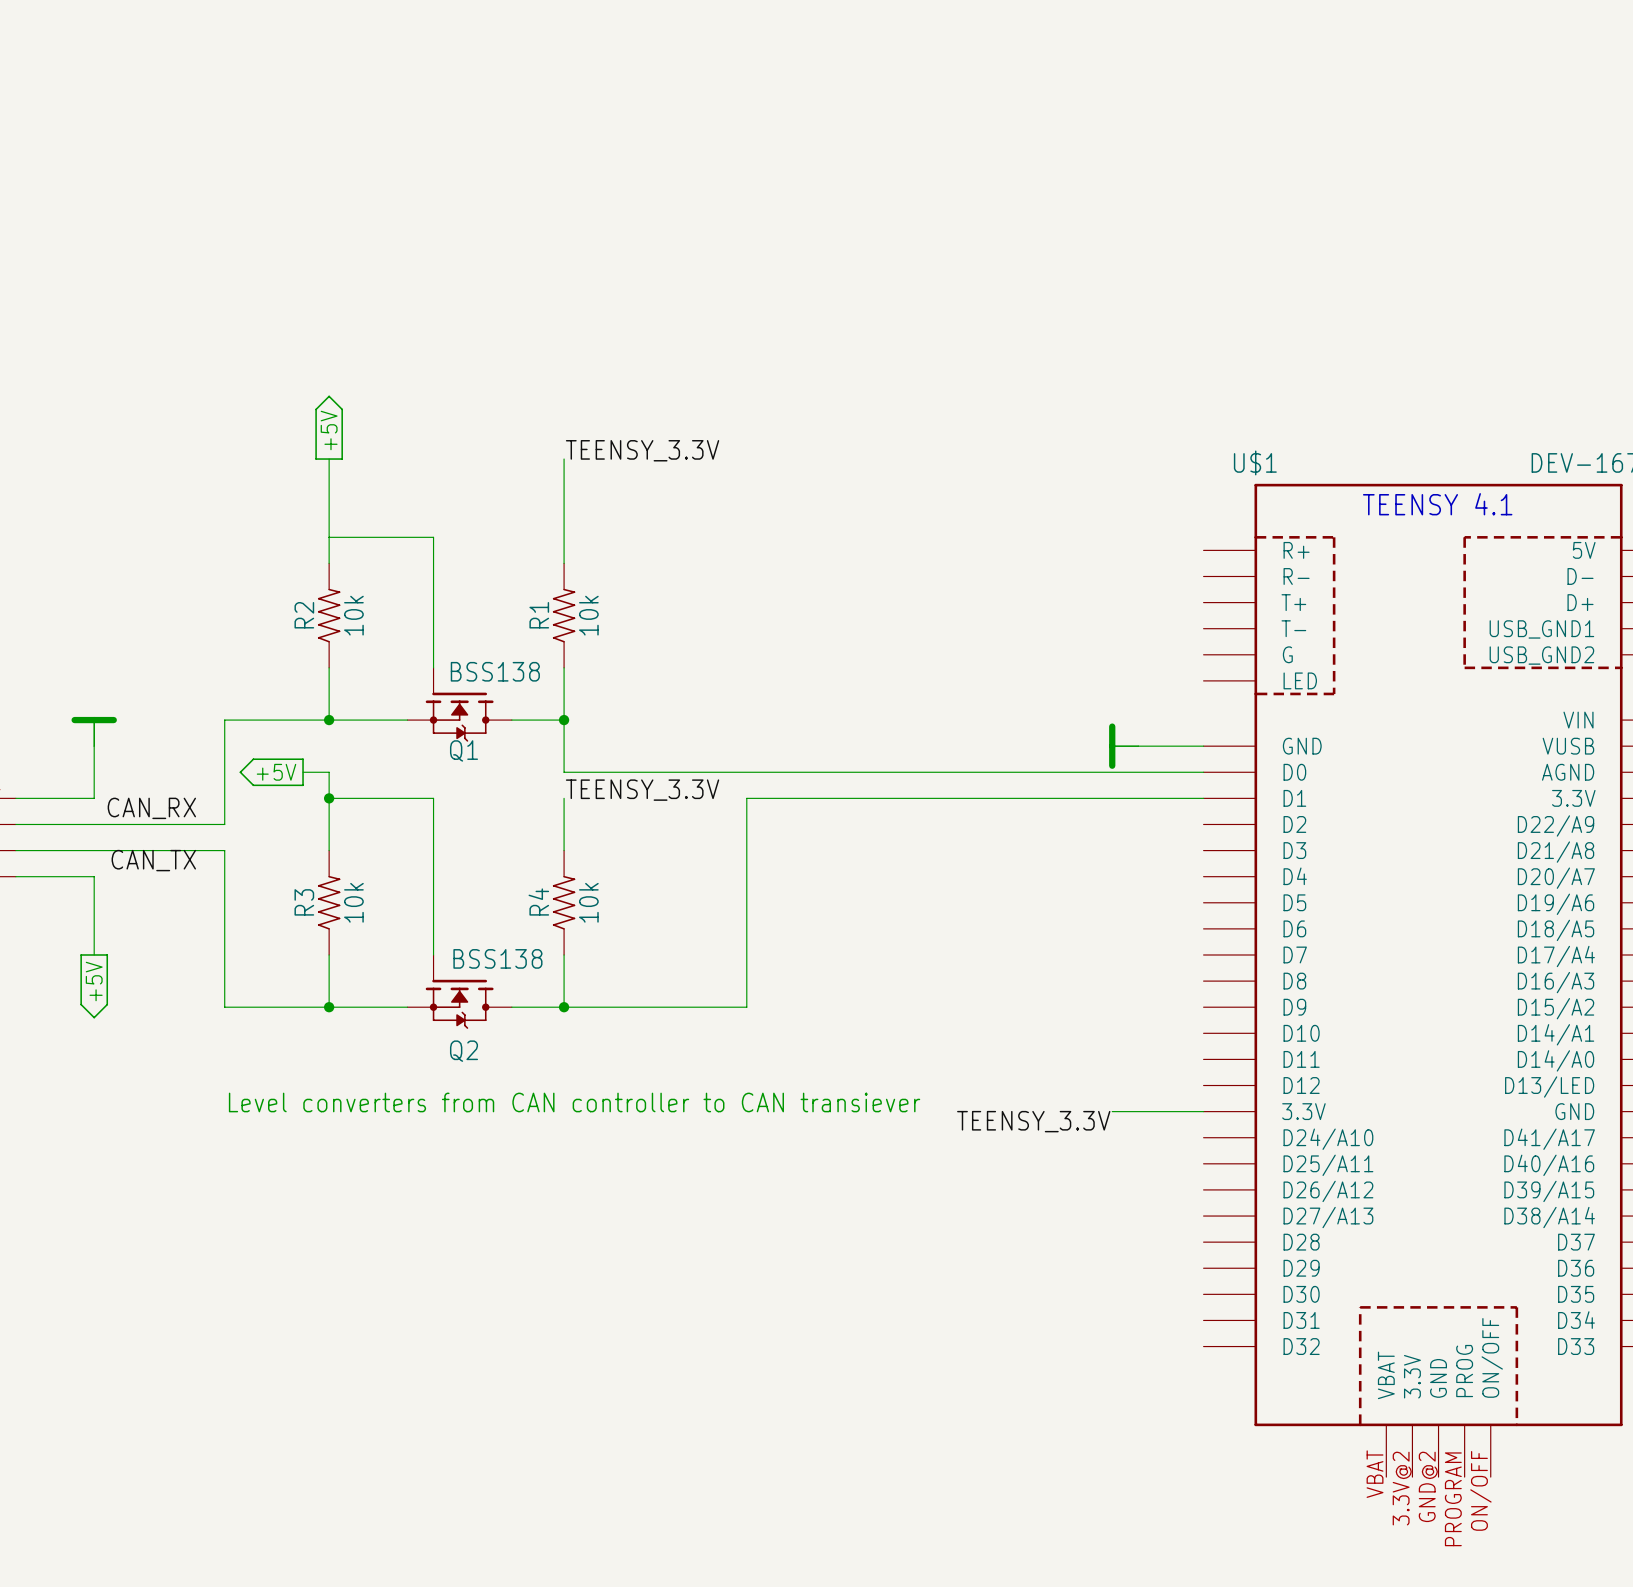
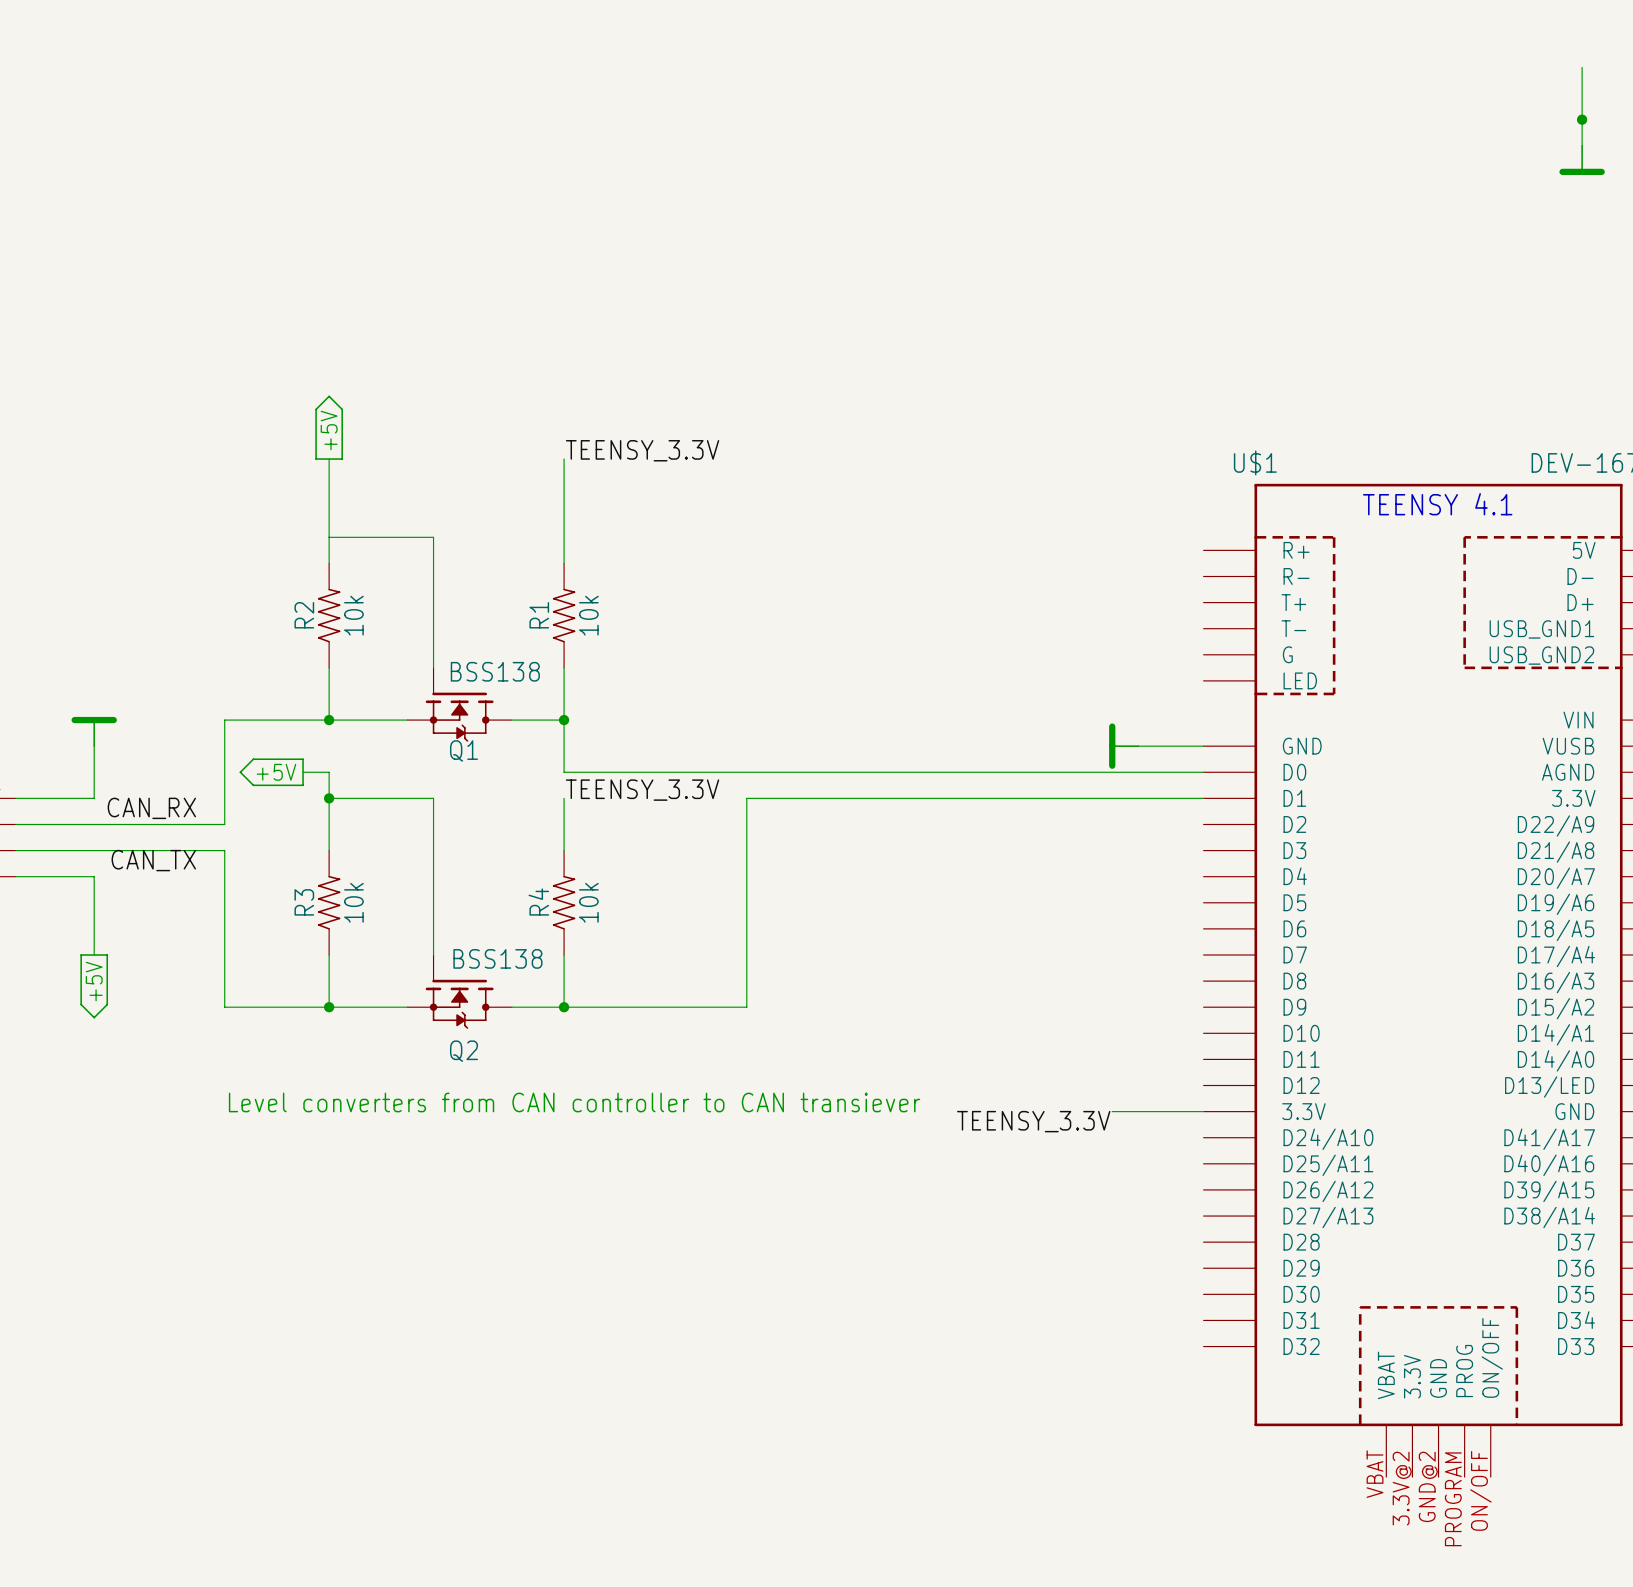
wire: none -> (1582, 67) (1582, 145)
junction: none -> (1582, 119)
power symbol: none -> (1582, 160)

